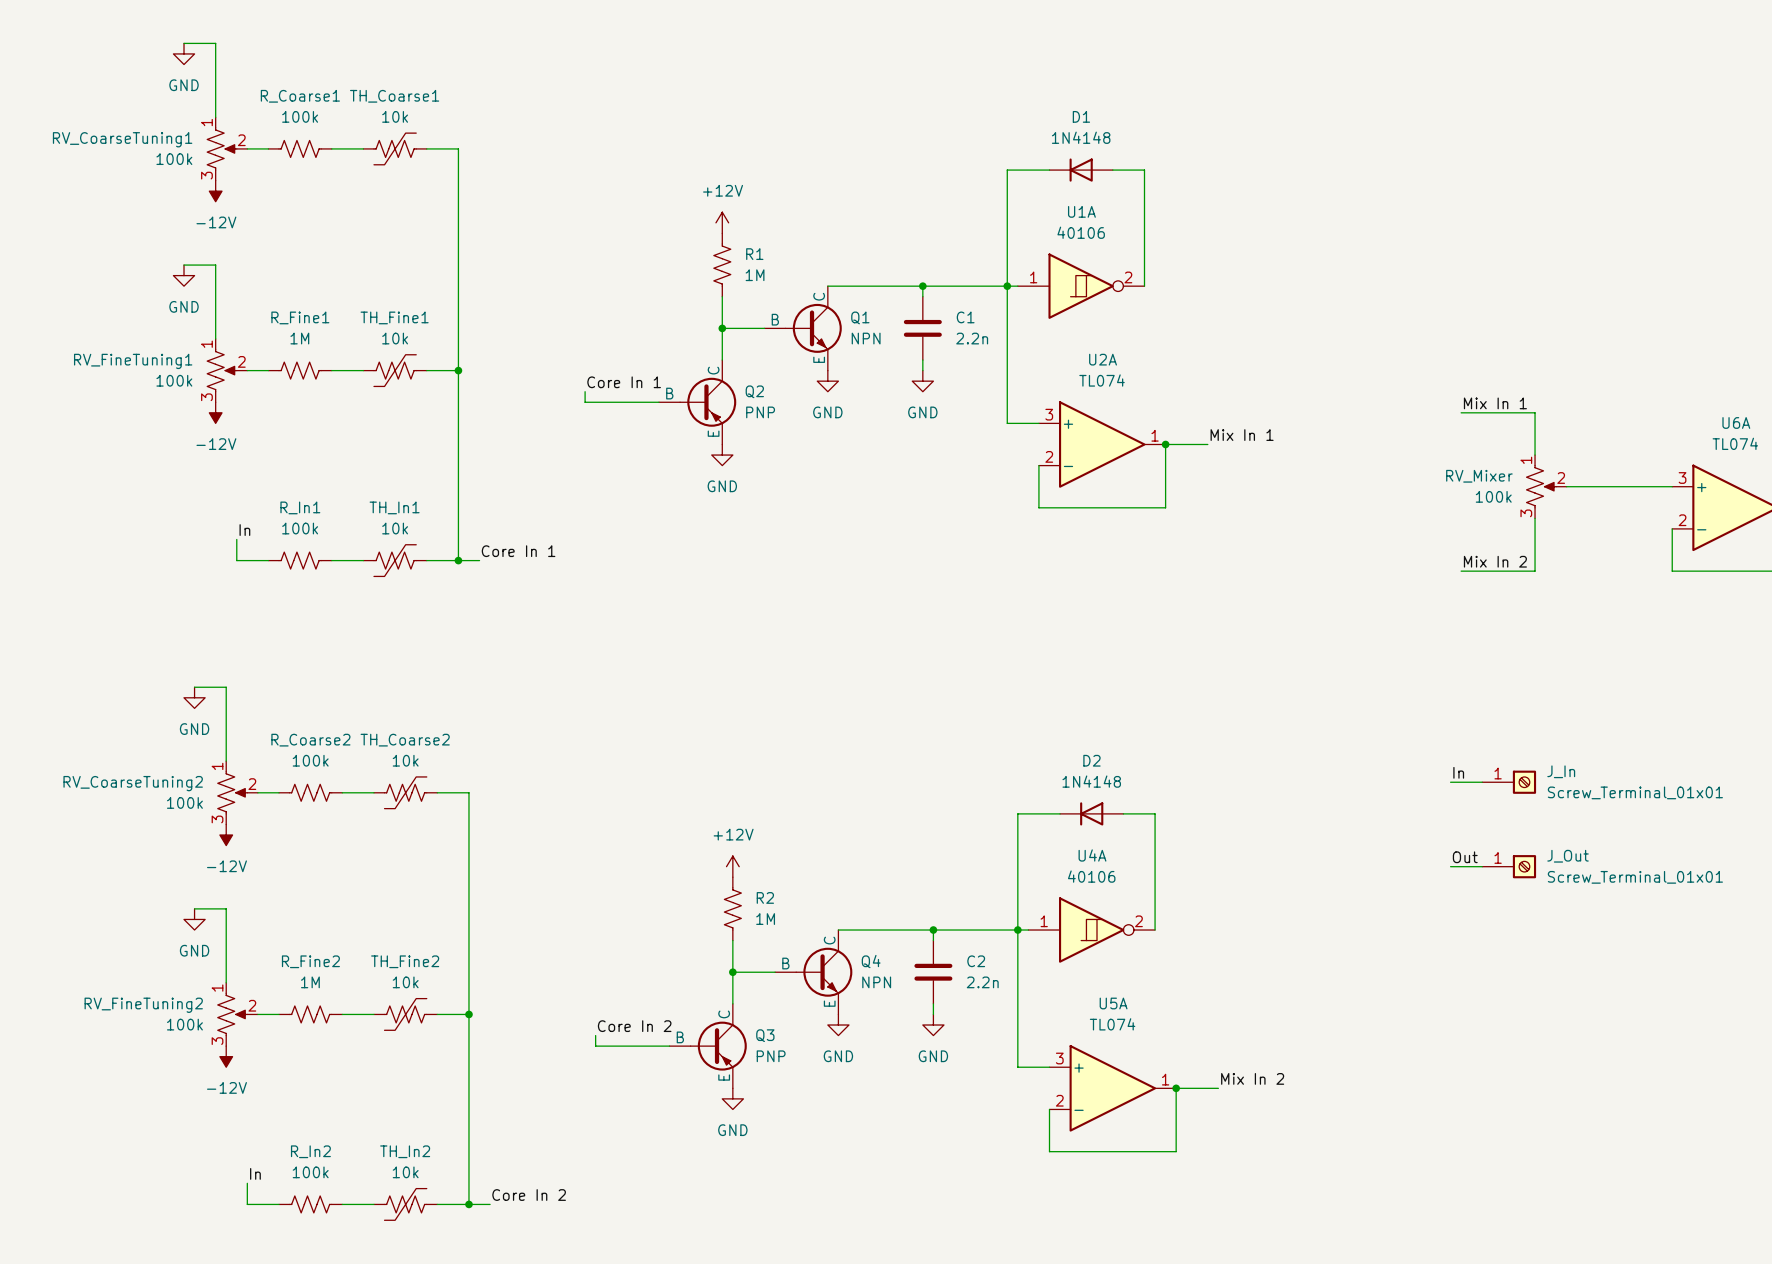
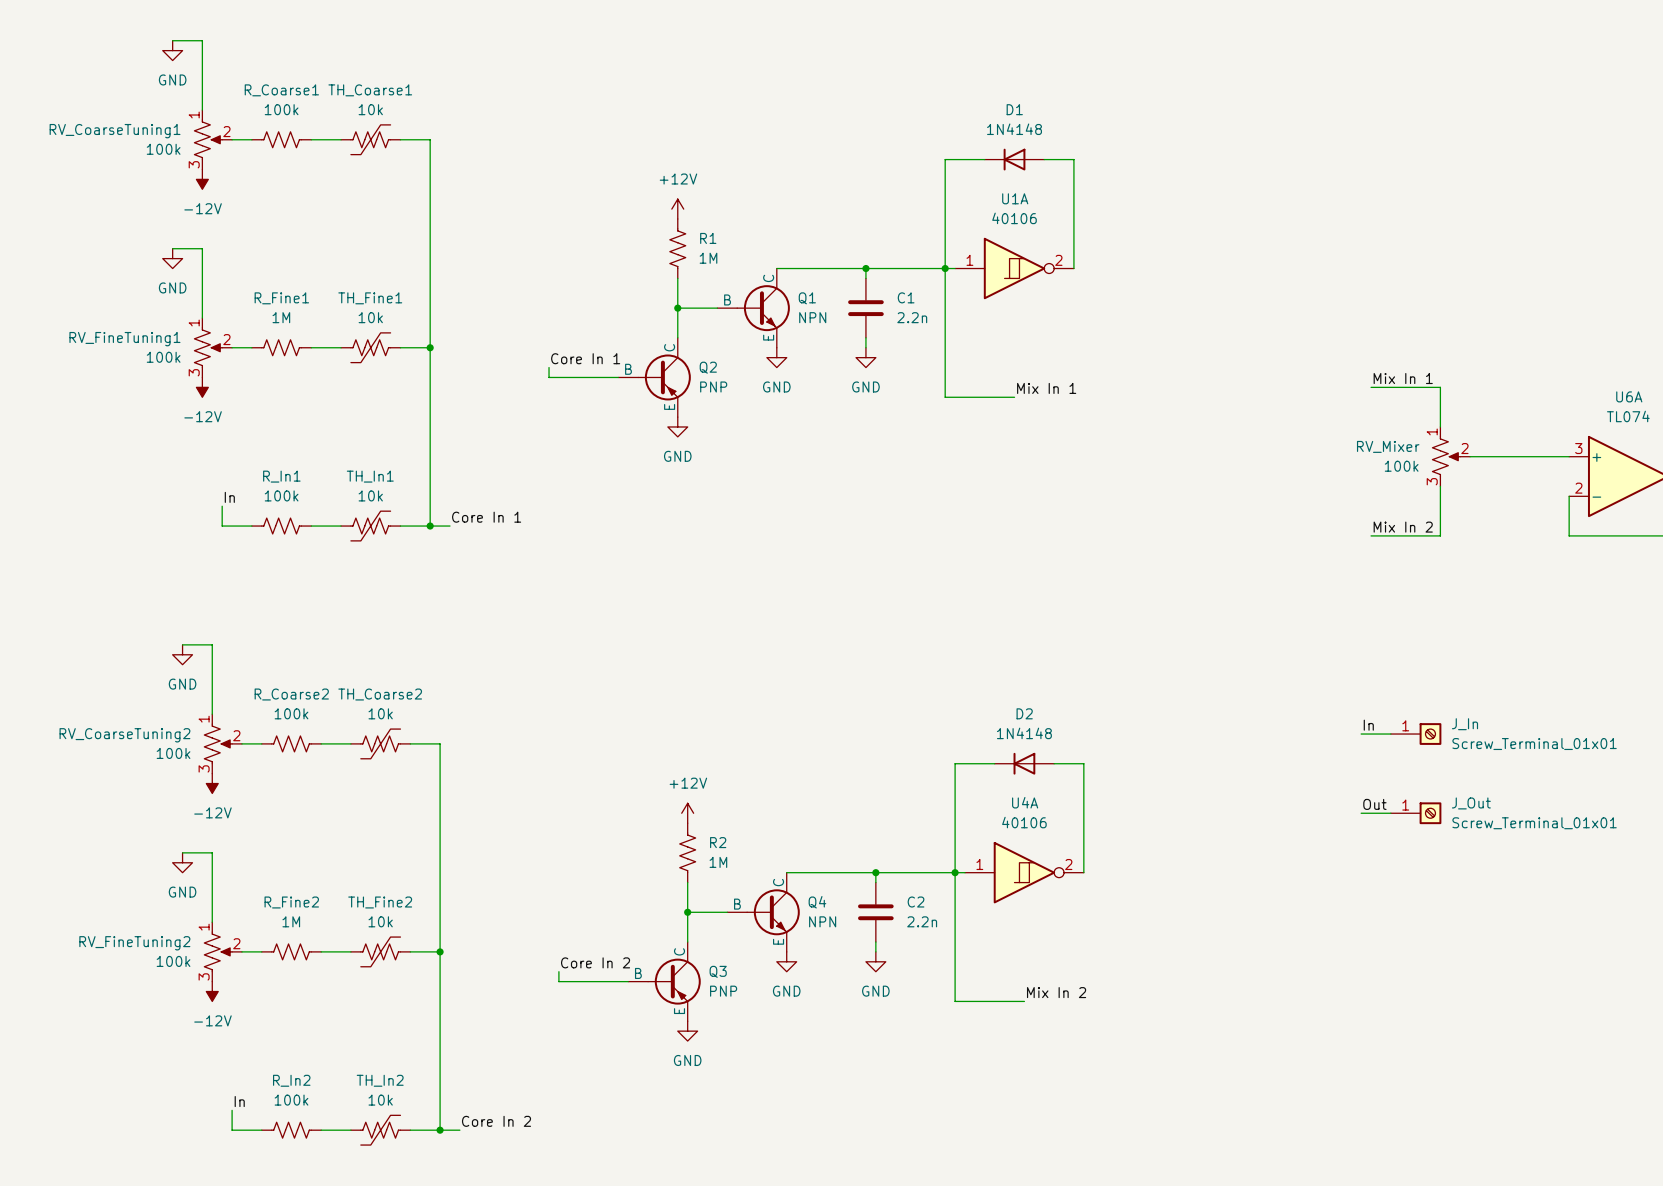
label position: Mix In 1 (1242, 435) -> Mix In 1 (1046, 388)
U2A: TL074 (1102, 444) -> none
junction: (1165, 444) -> none
wire: (1207, 444) (1165, 444) (1165, 507) (1038, 507) (1038, 465) -> none
label position: Mix In 2 (1252, 1078) -> Mix In 2 (1056, 992)
U5A: TL074 (1112, 1088) -> none
junction: (1176, 1088) -> none
wire: (1218, 1088) (1176, 1088) (1176, 1151) (1049, 1151) (1049, 1109) -> none

